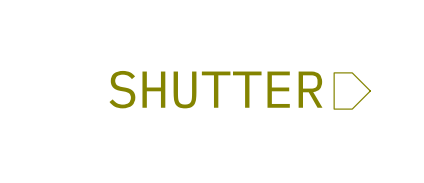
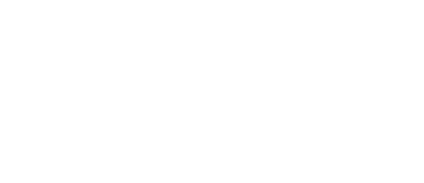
hierarchical label: SHUTTER (215, 89) -> none

